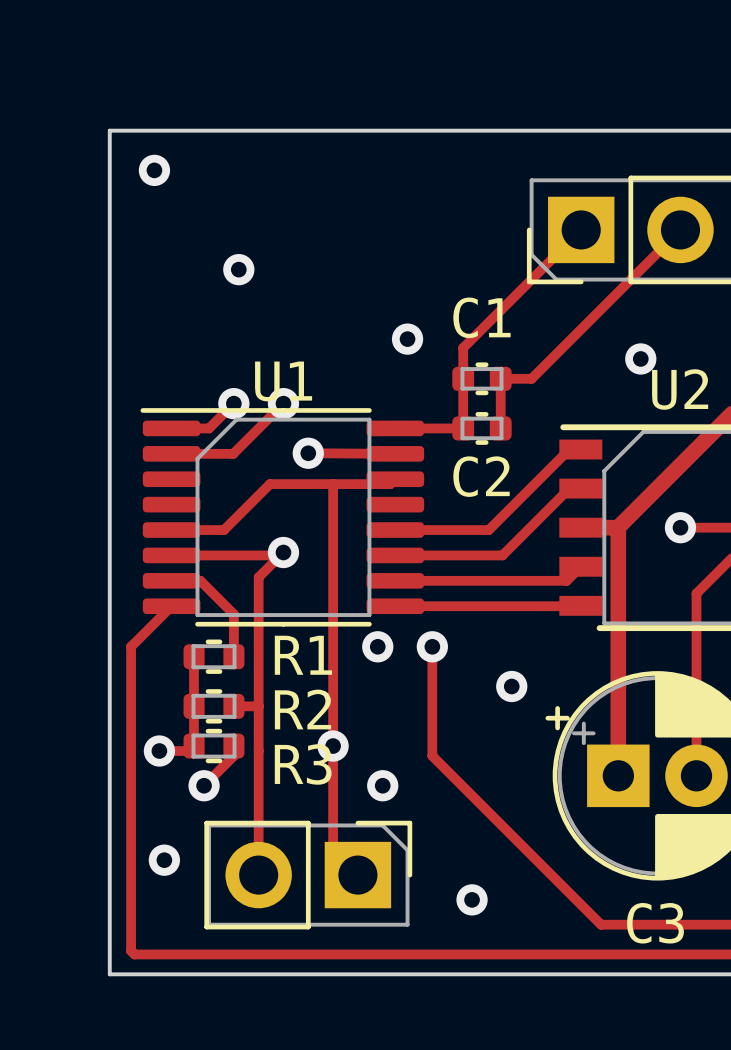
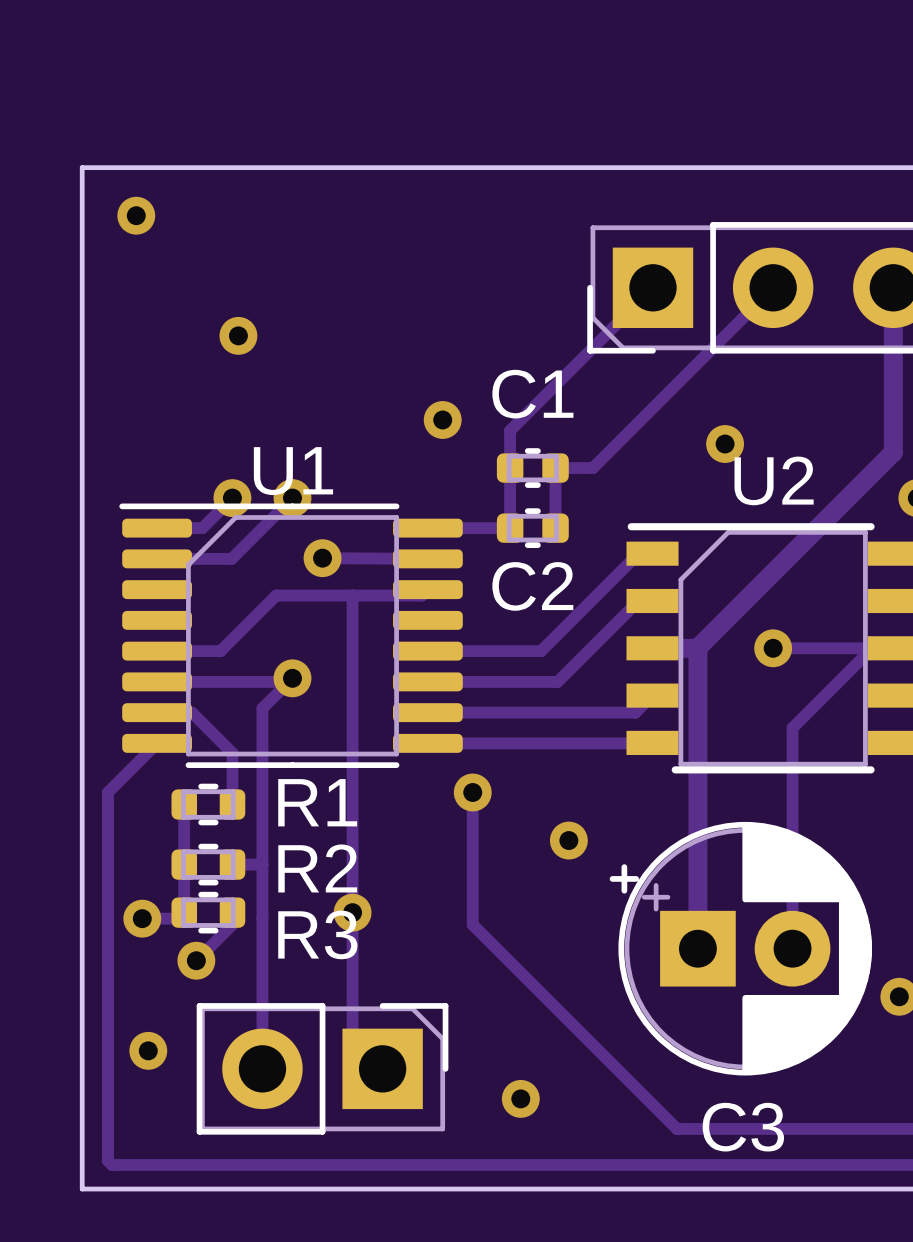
via: (377, 646) -> none
via: (382, 785) -> none

